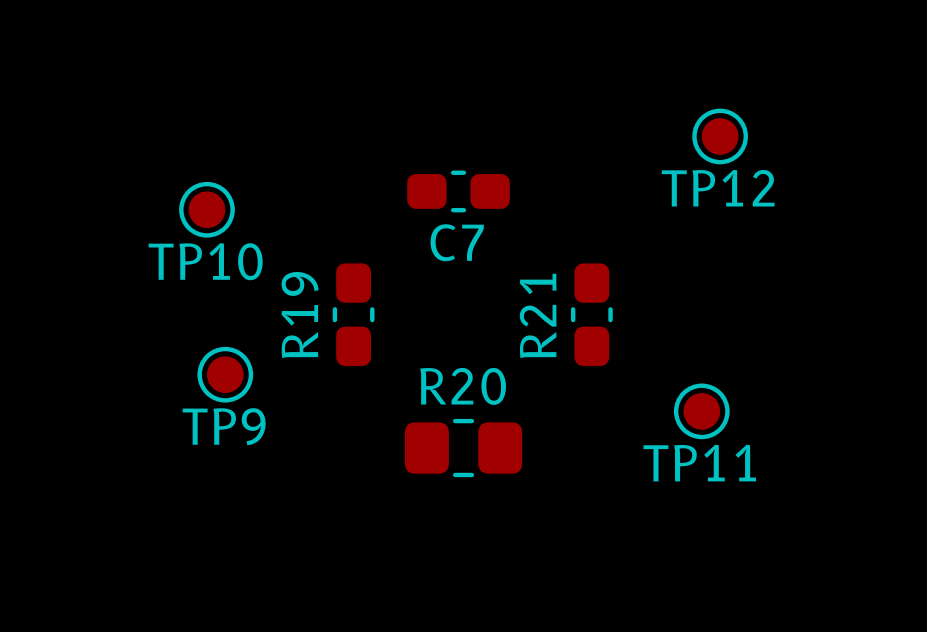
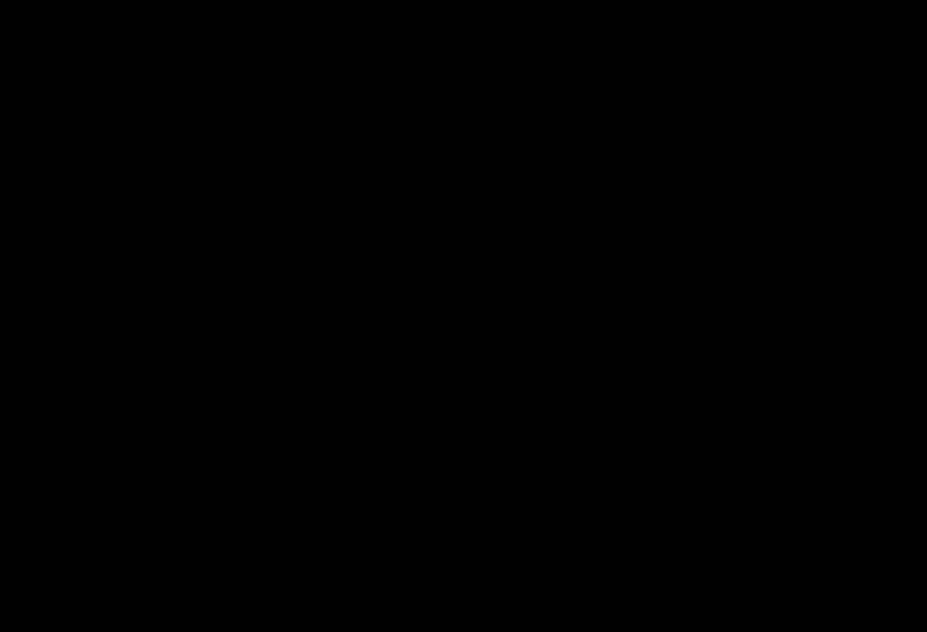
TP12: (720, 136) -> none
C7: (458, 191) -> none
TP10: (206, 209) -> none
R19: (353, 314) -> none
R21: (591, 314) -> none
TP9: (225, 374) -> none
TP11: (701, 411) -> none
R20: (463, 448) -> none

